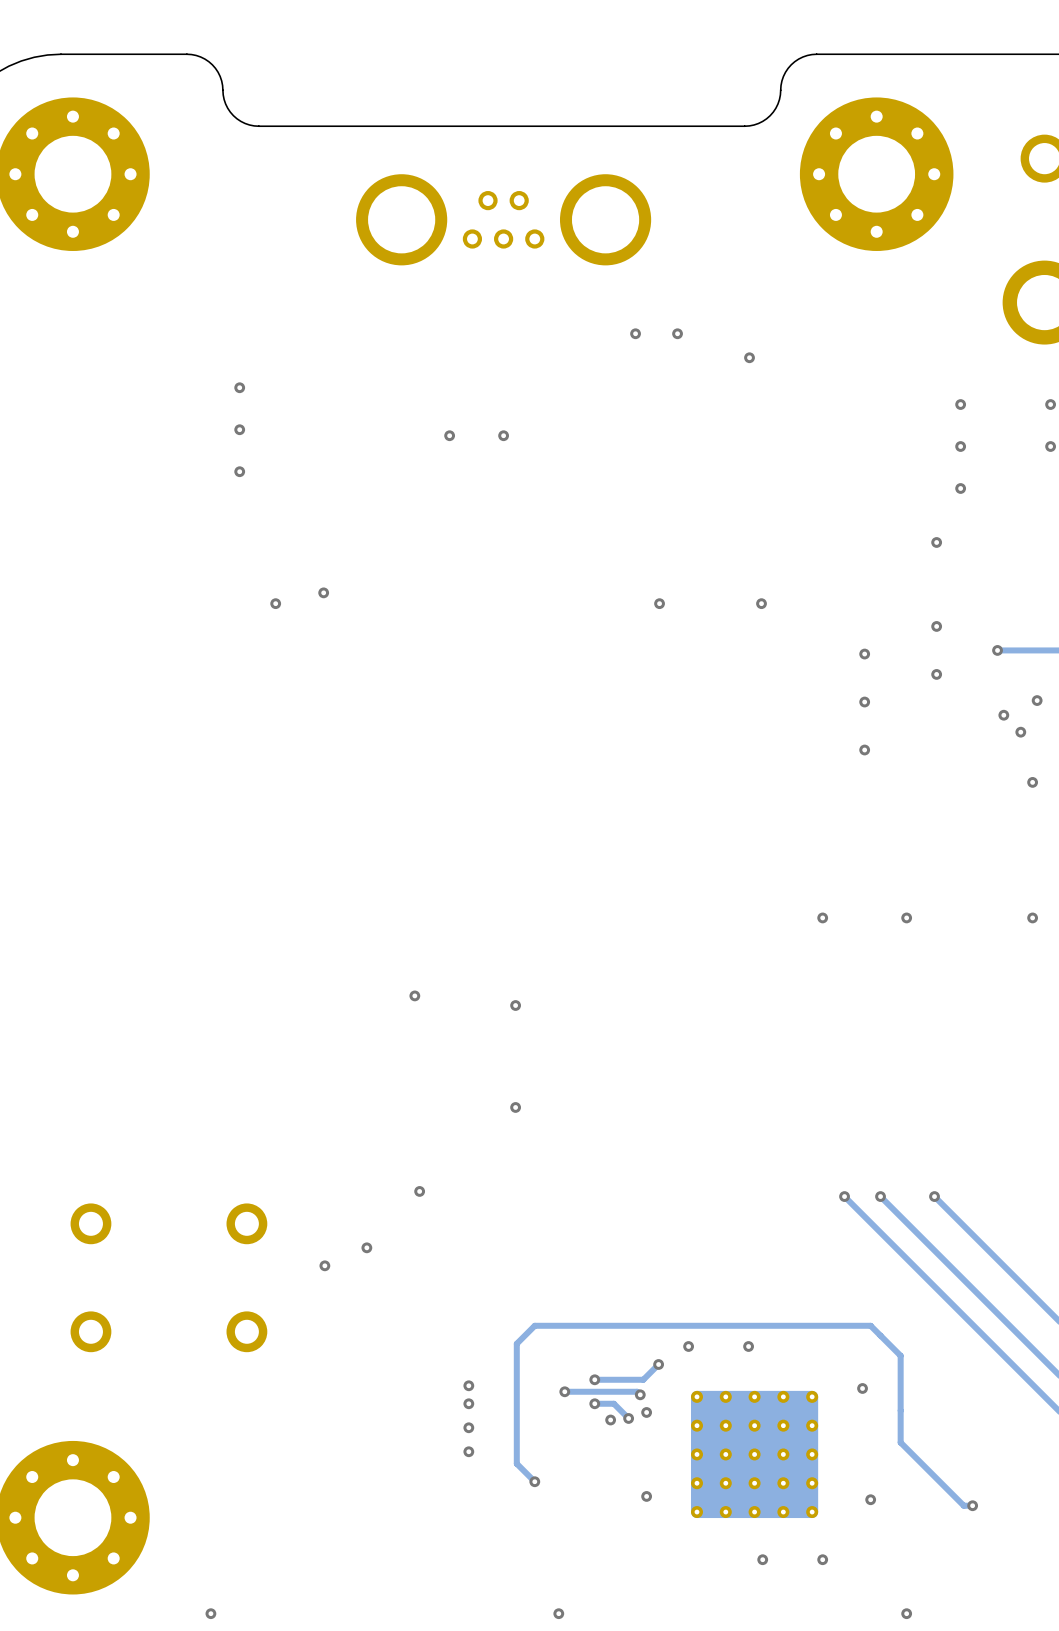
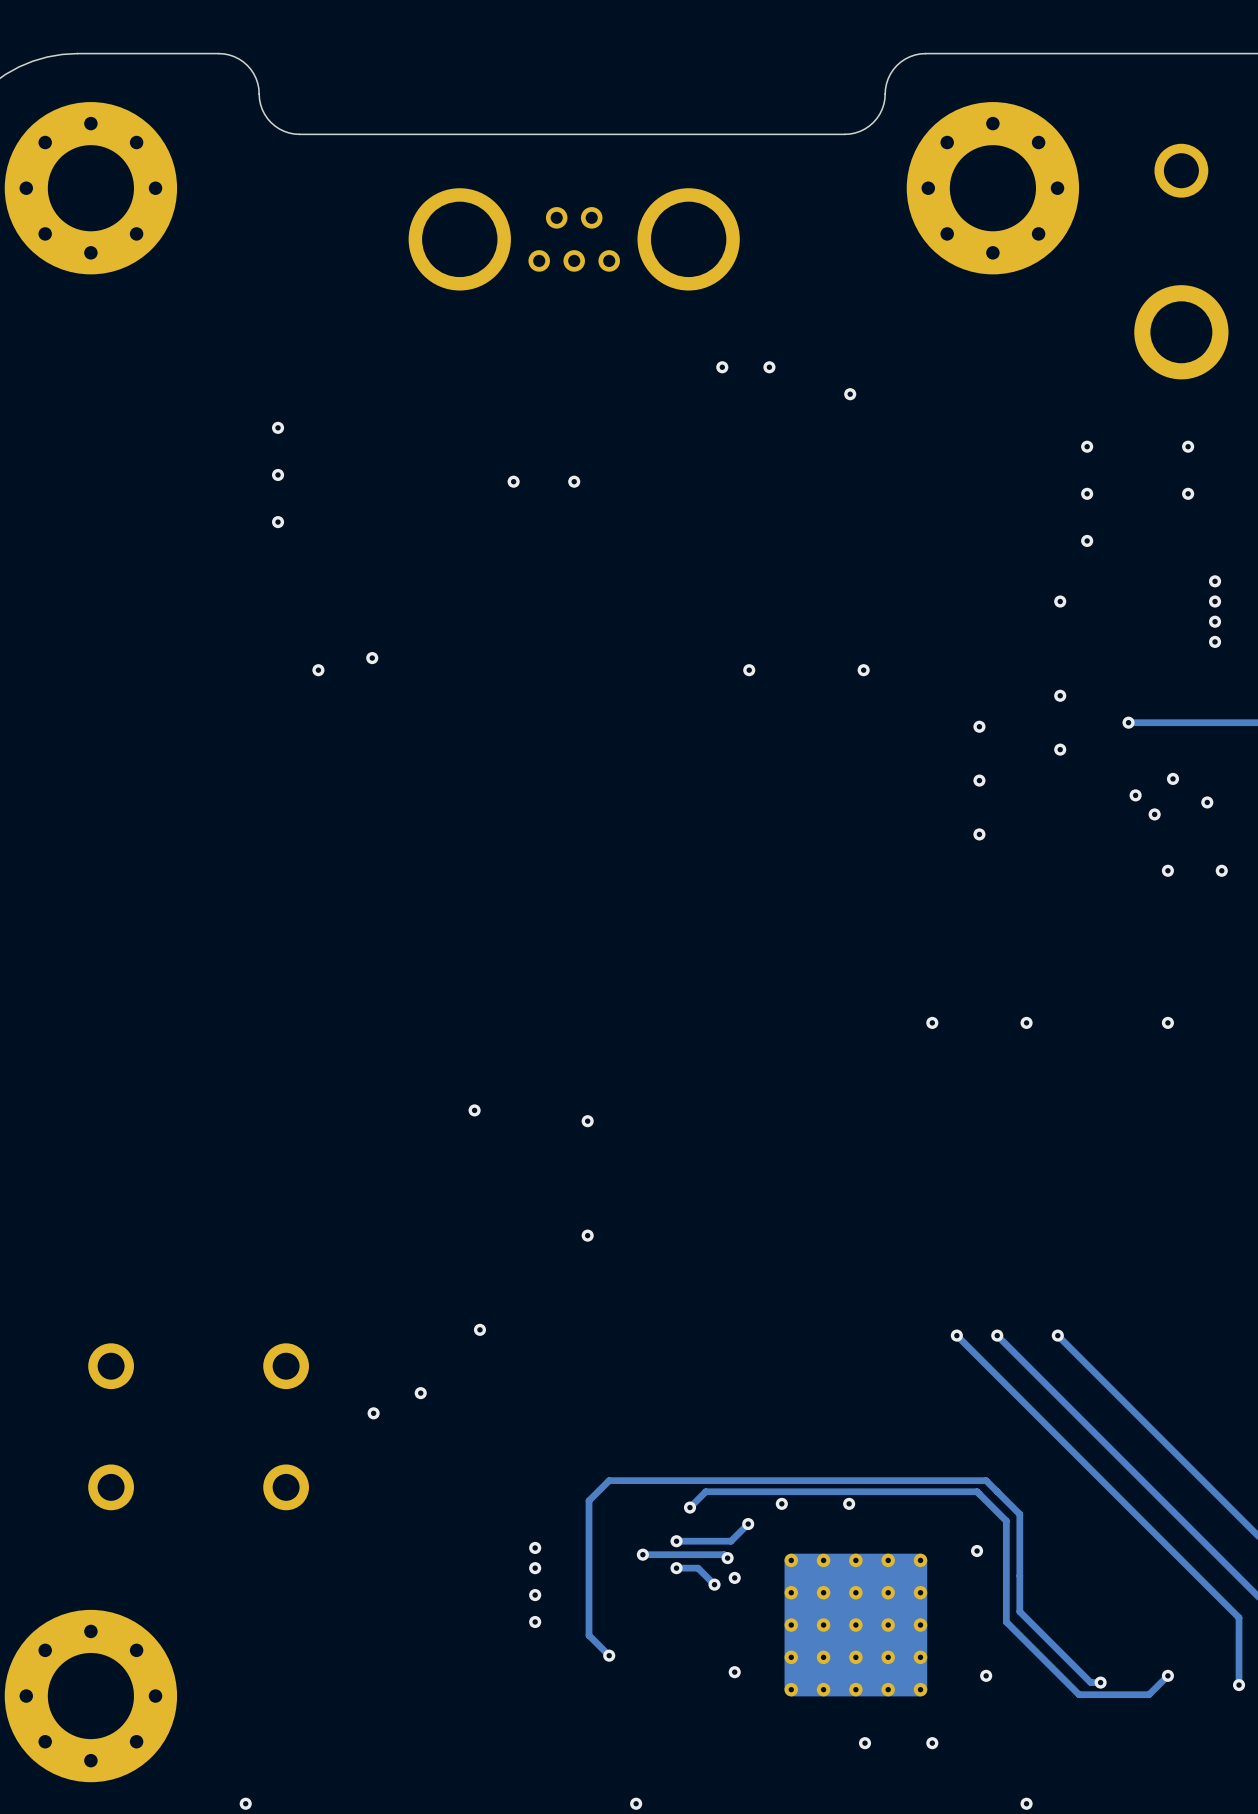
track: none -> (689, 1507) (705, 1491) (977, 1491) (1006, 1521) (1006, 1621) (1079, 1694) (1149, 1694) (1167, 1675)
via position: (610, 1420) -> (689, 1507)
via: none -> (1167, 1675)

